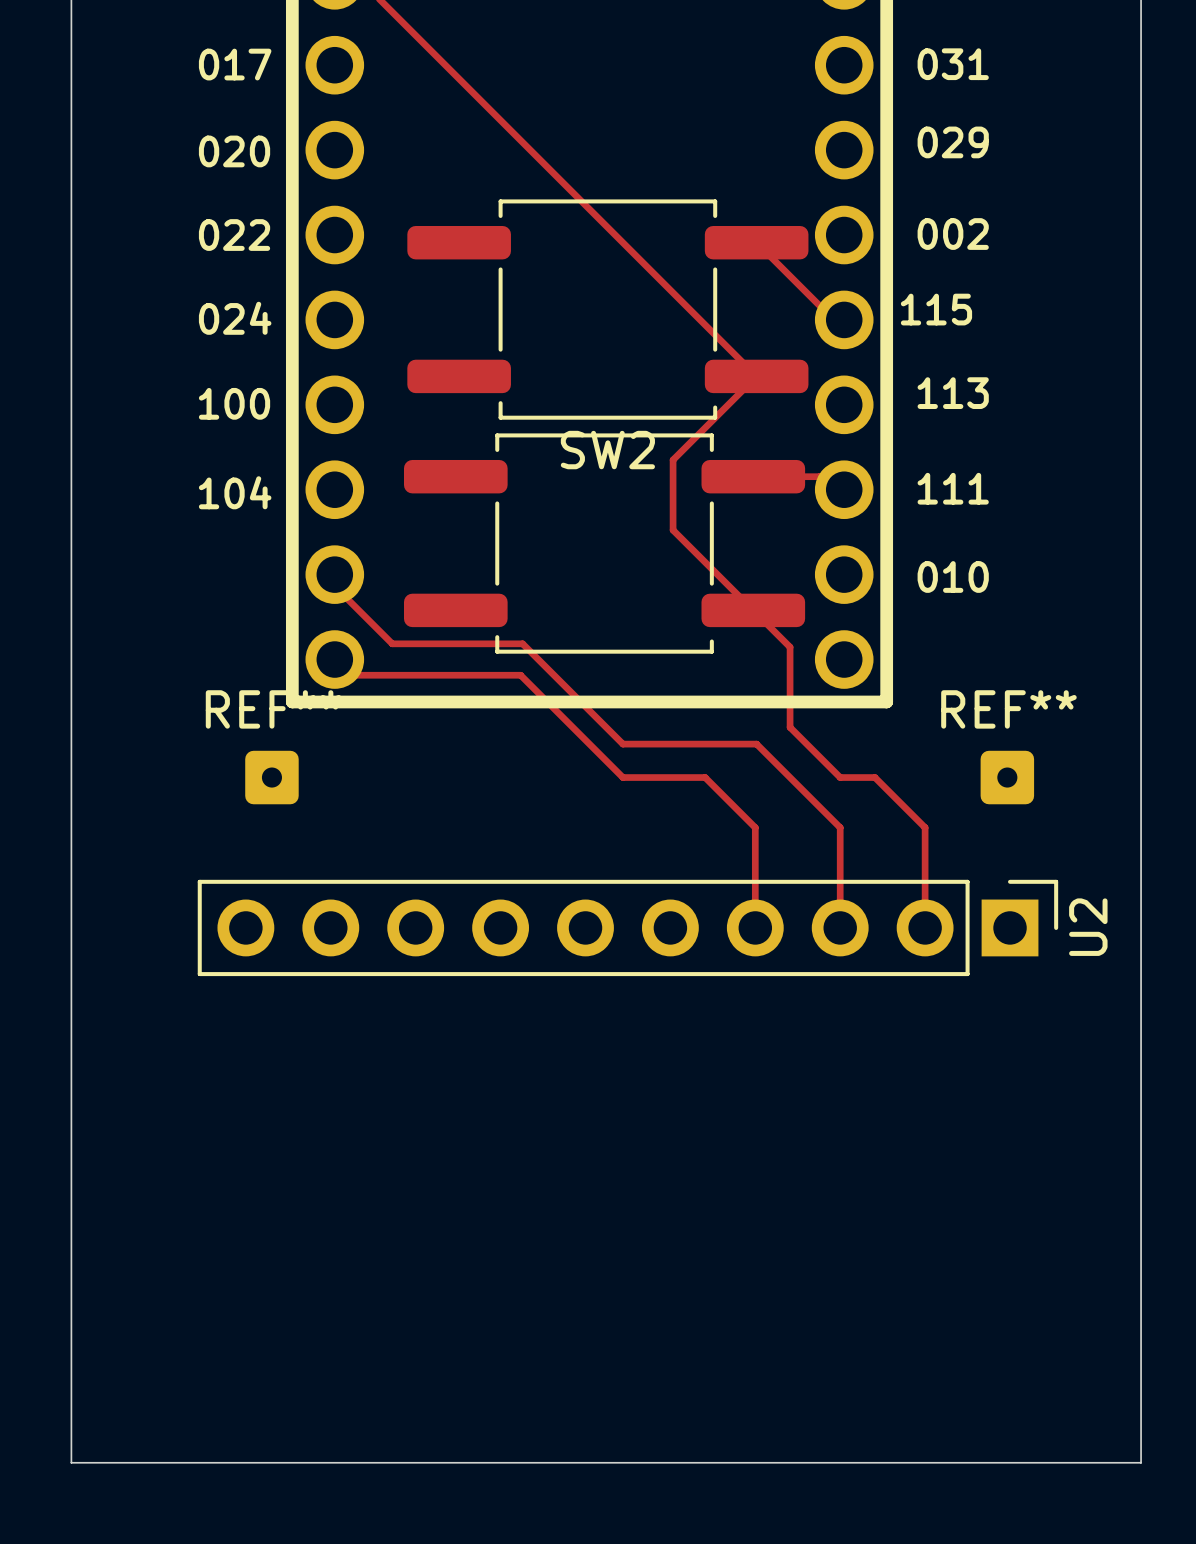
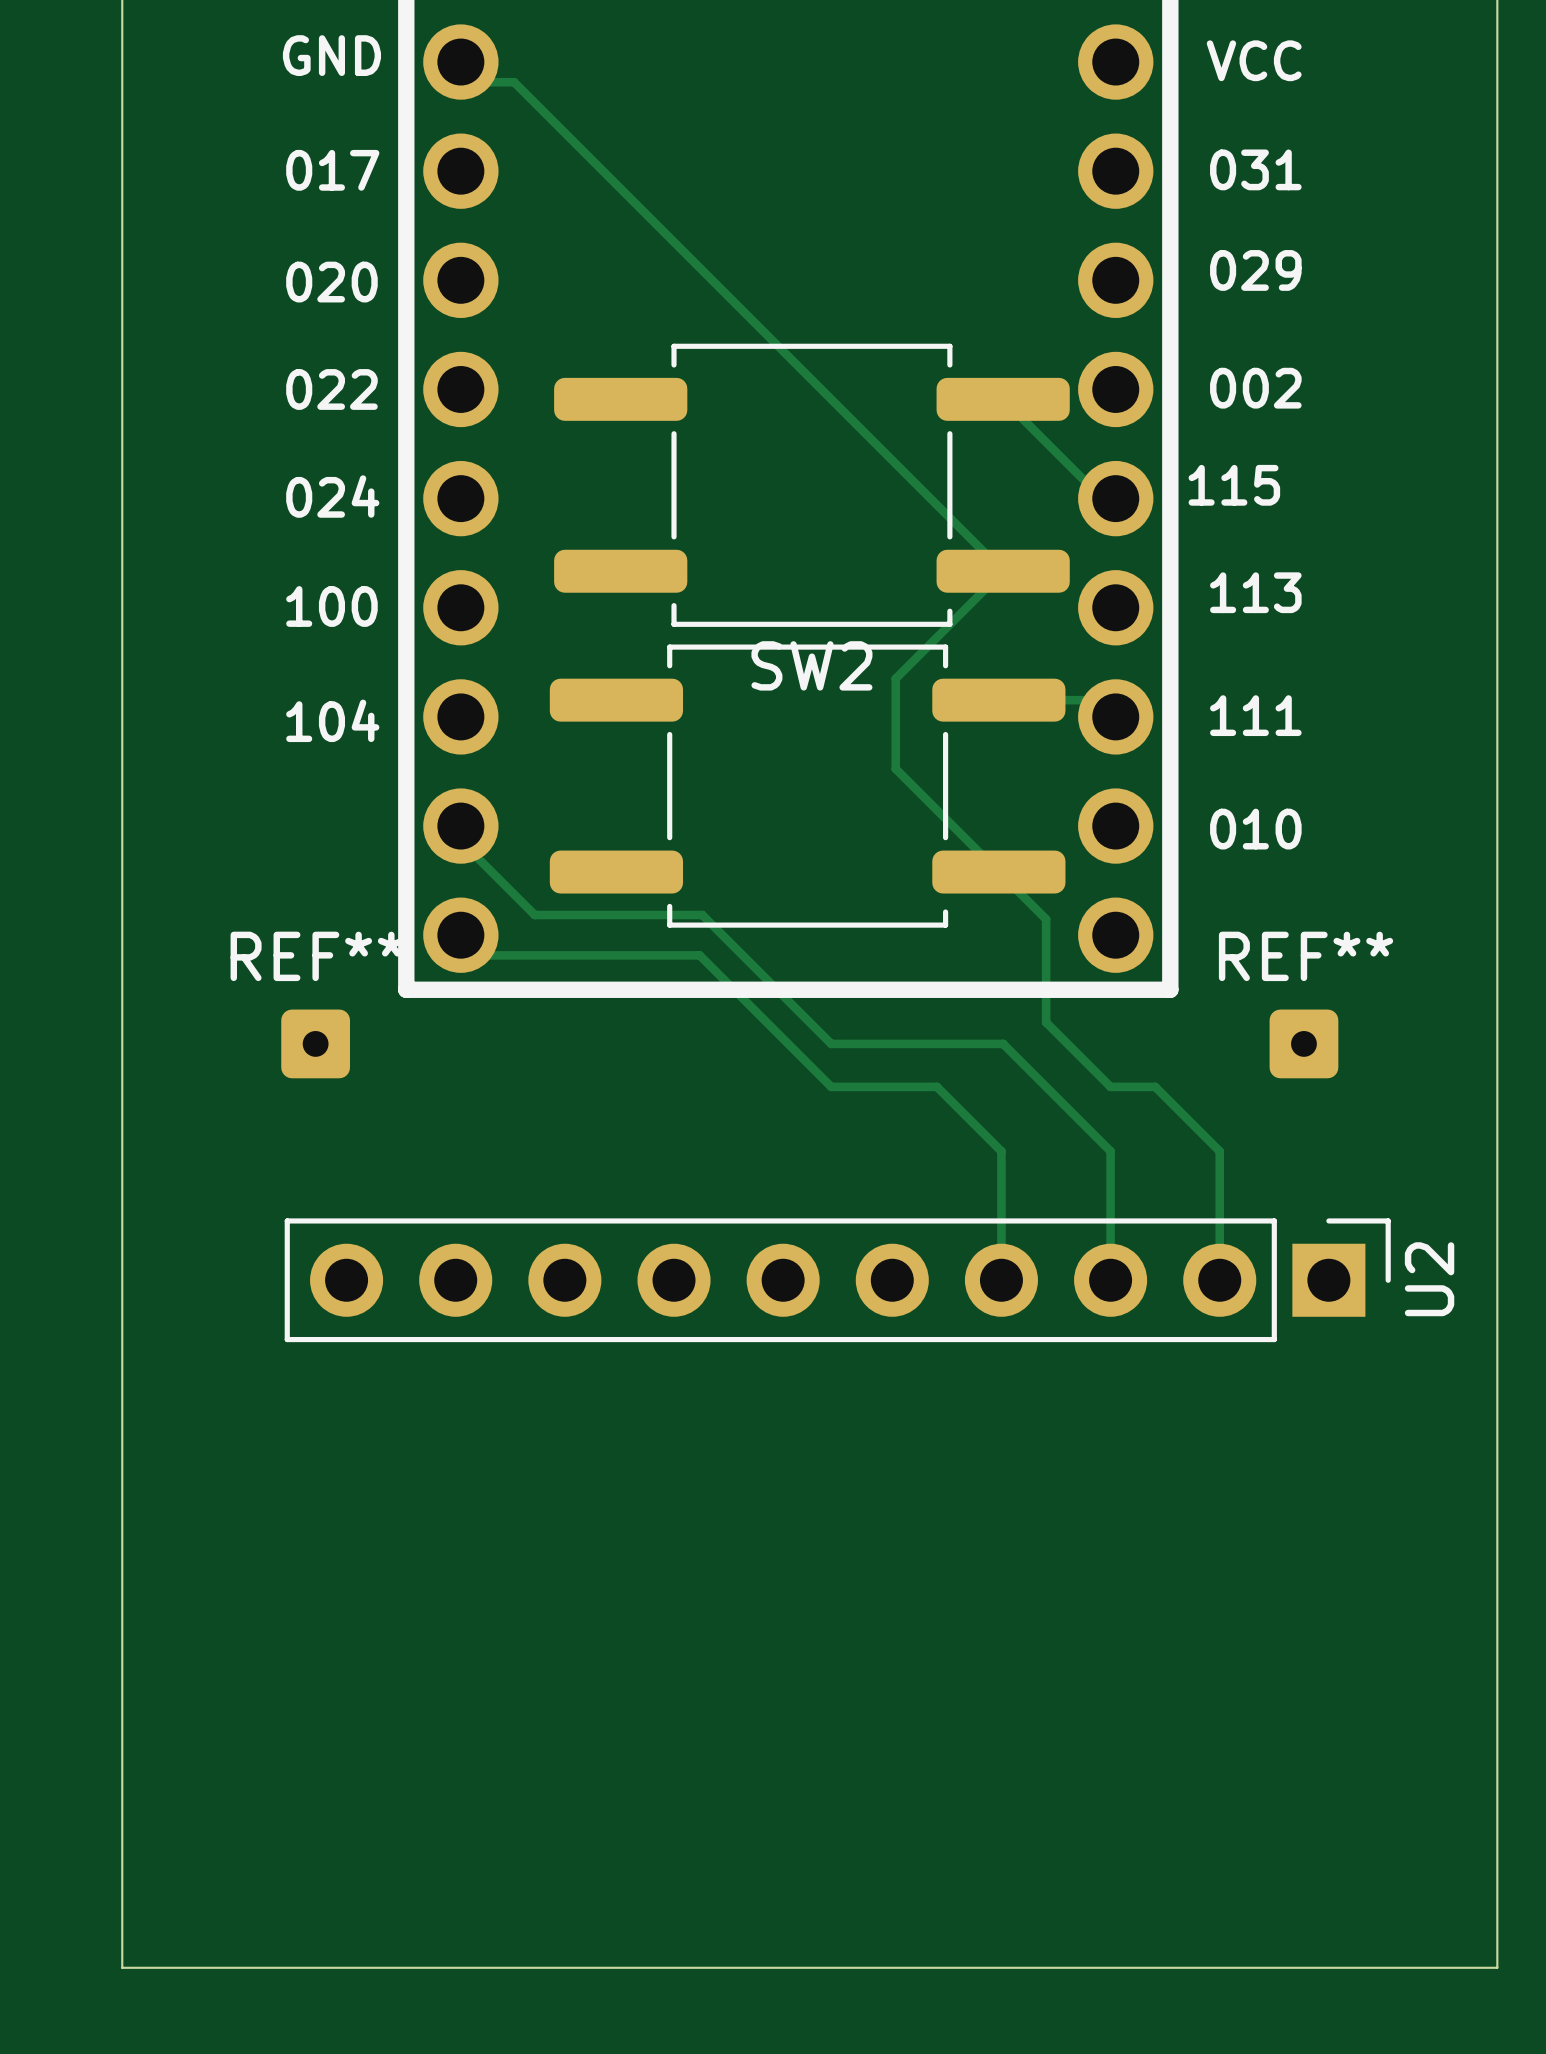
REF** position: (271, 777) -> (315, 1043)
REF** position: (1007, 777) -> (1303, 1043)

